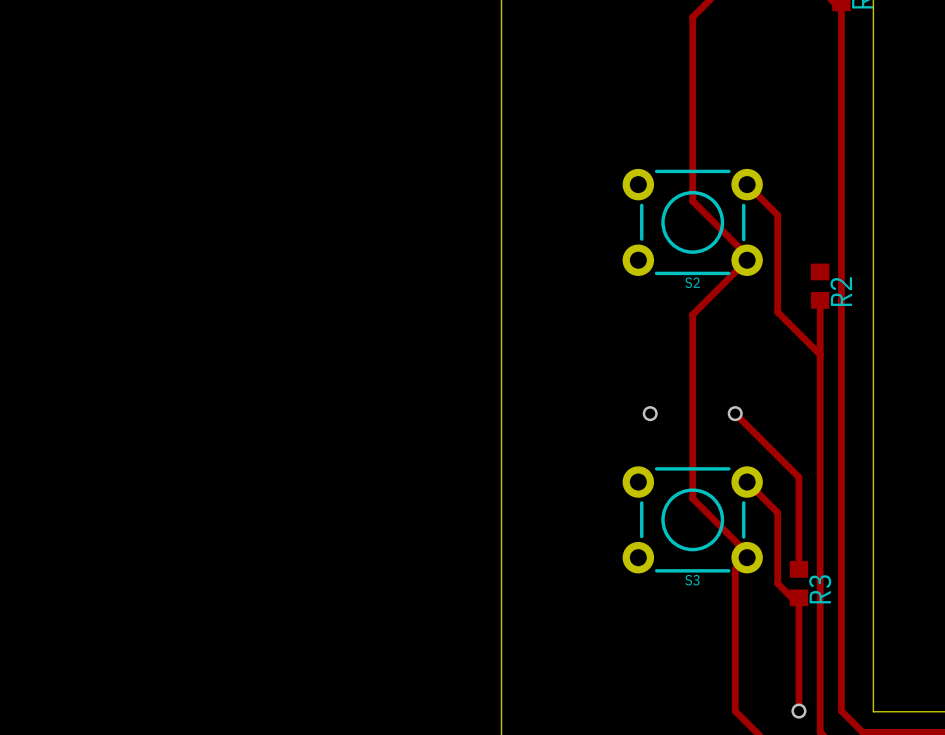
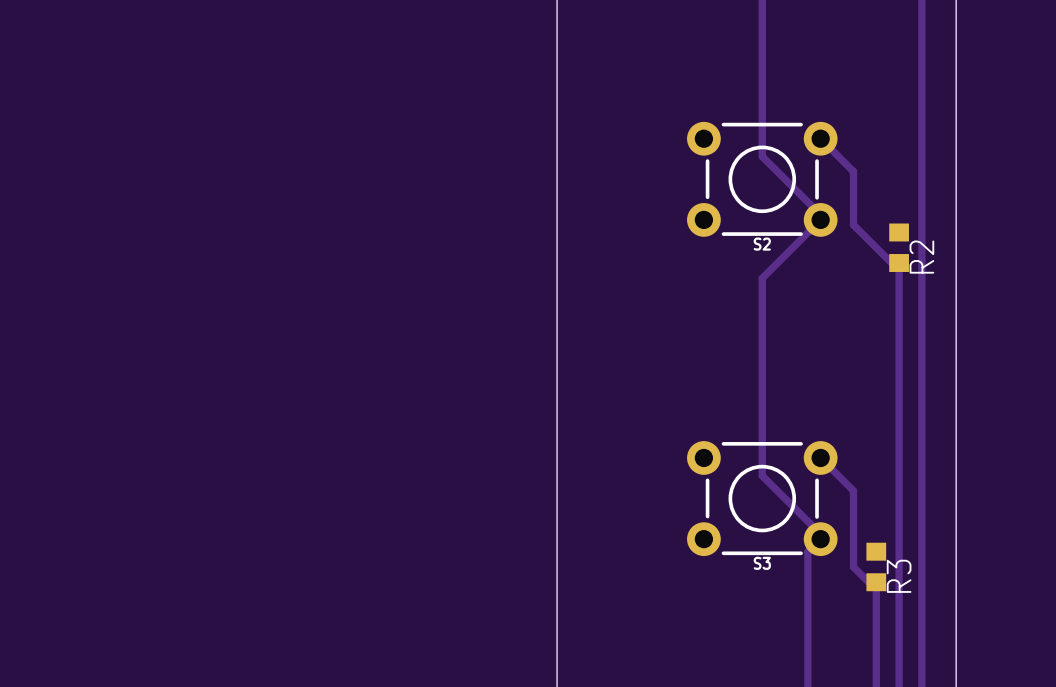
track: (777, 264) (777, 312) (820, 354) -> (853, 224) (899, 270)
via: (650, 413) -> none
track: (735, 413) (798, 477) (798, 569) -> none
via: (735, 413) -> none

